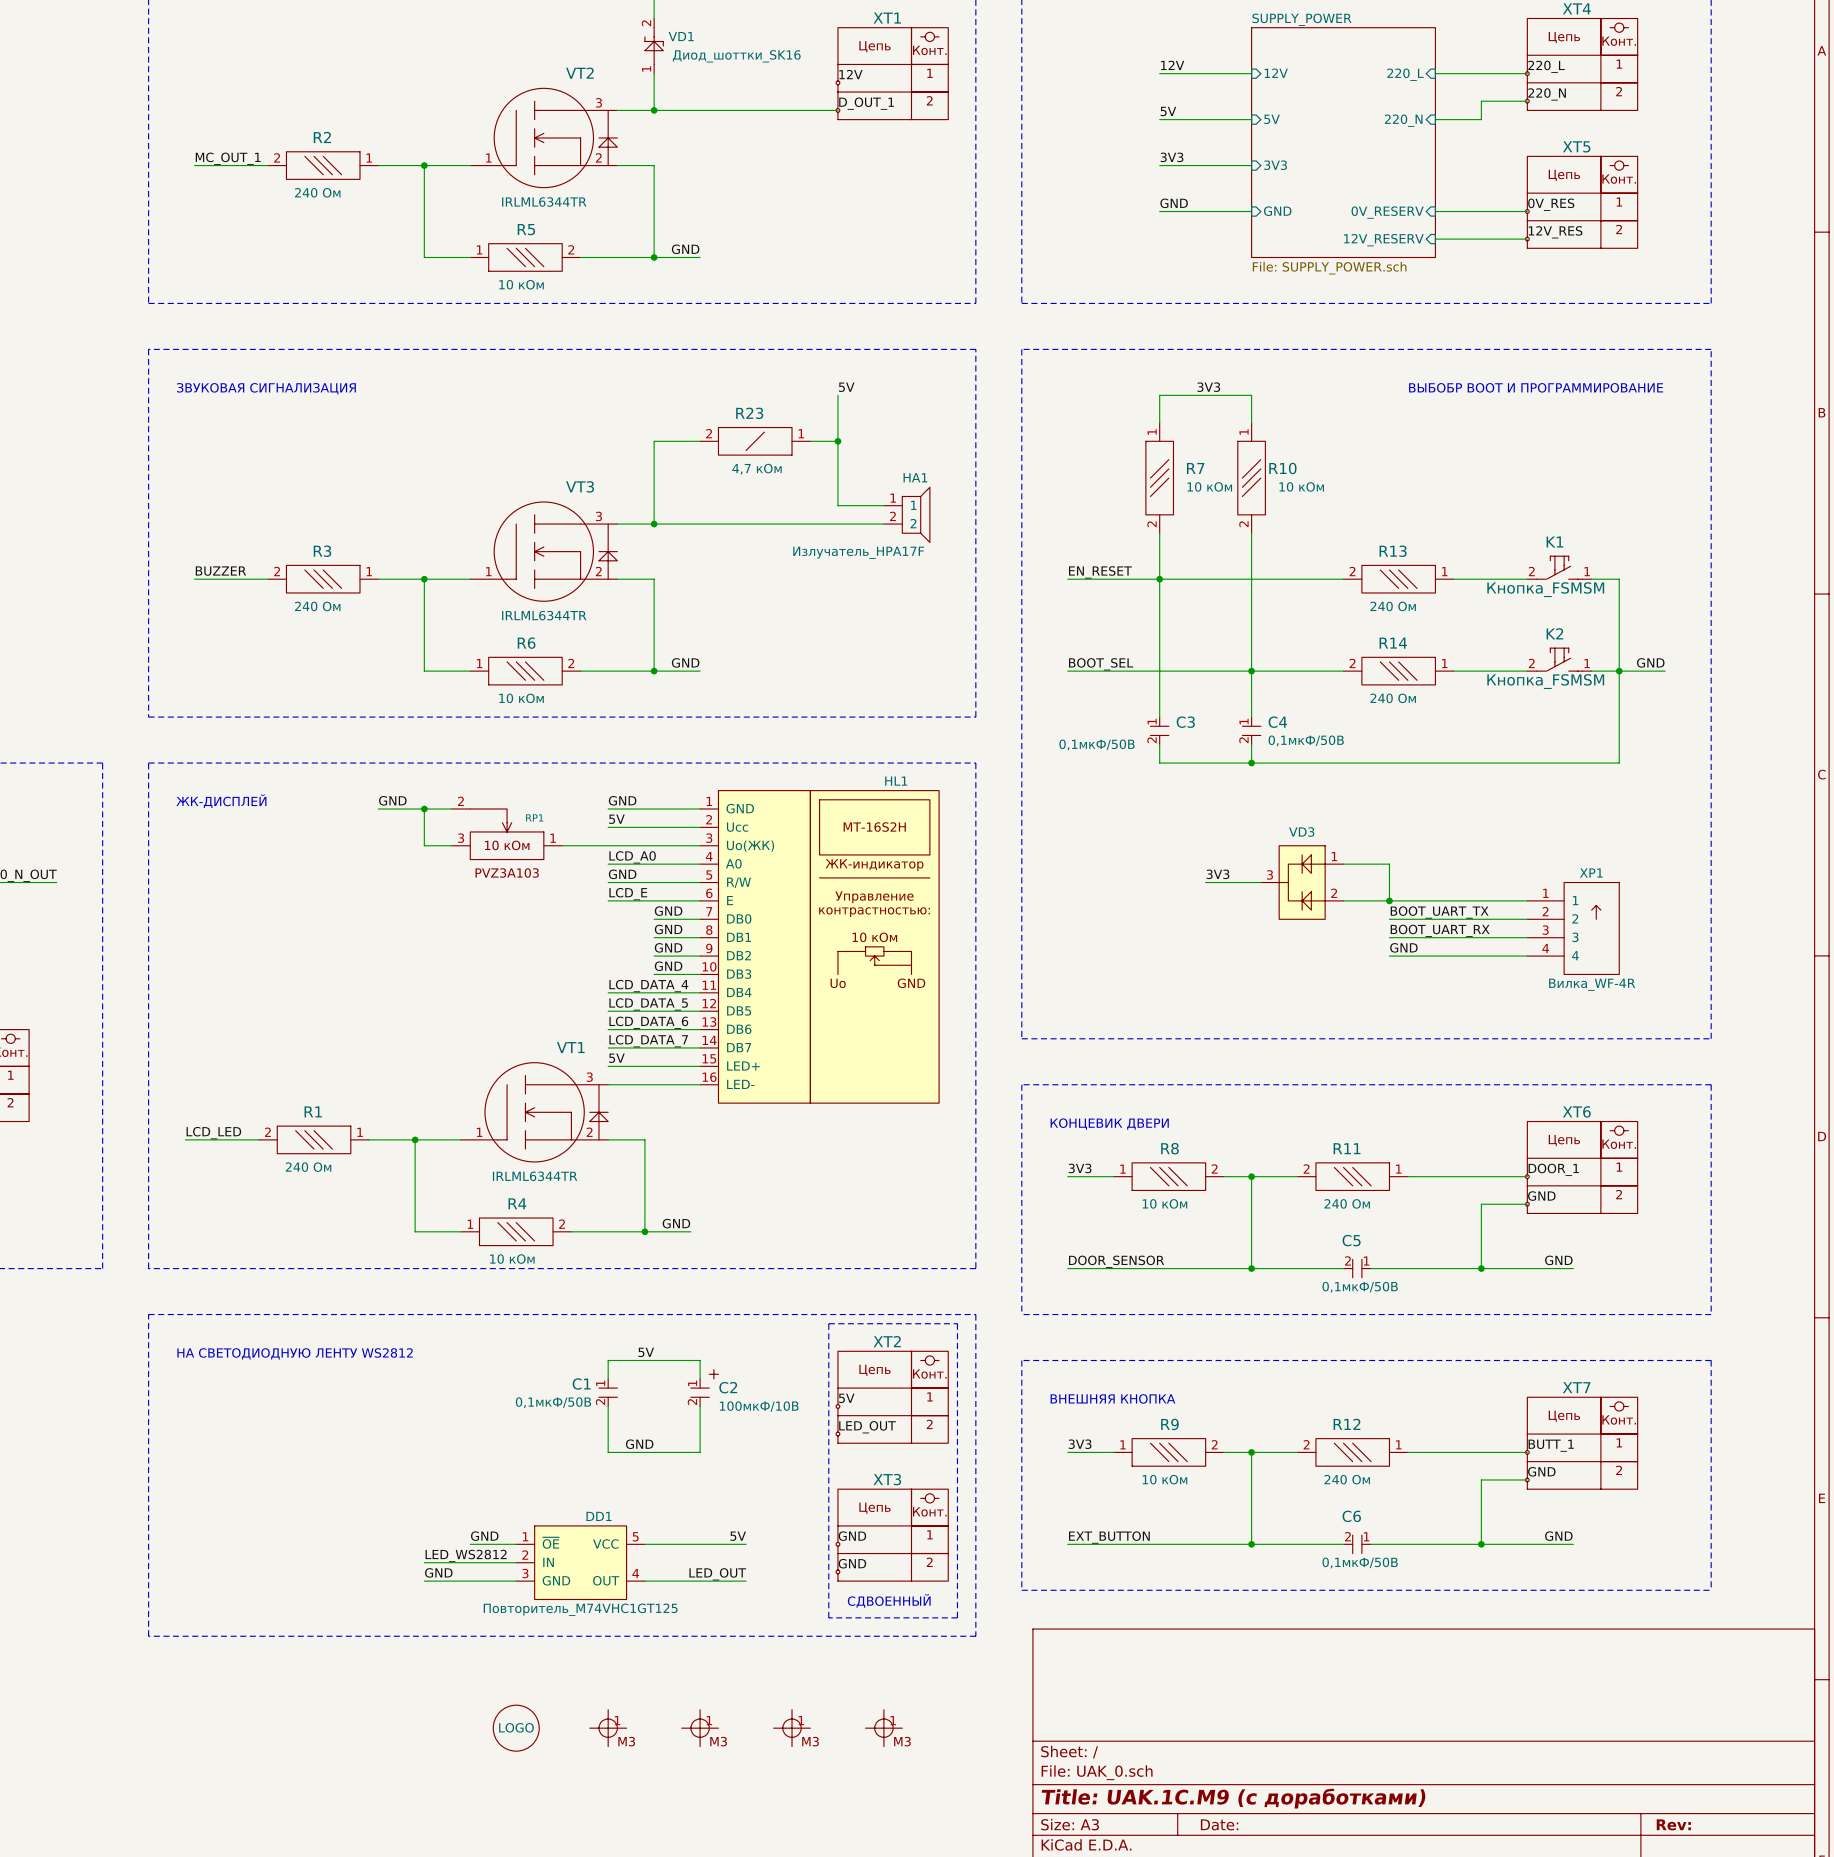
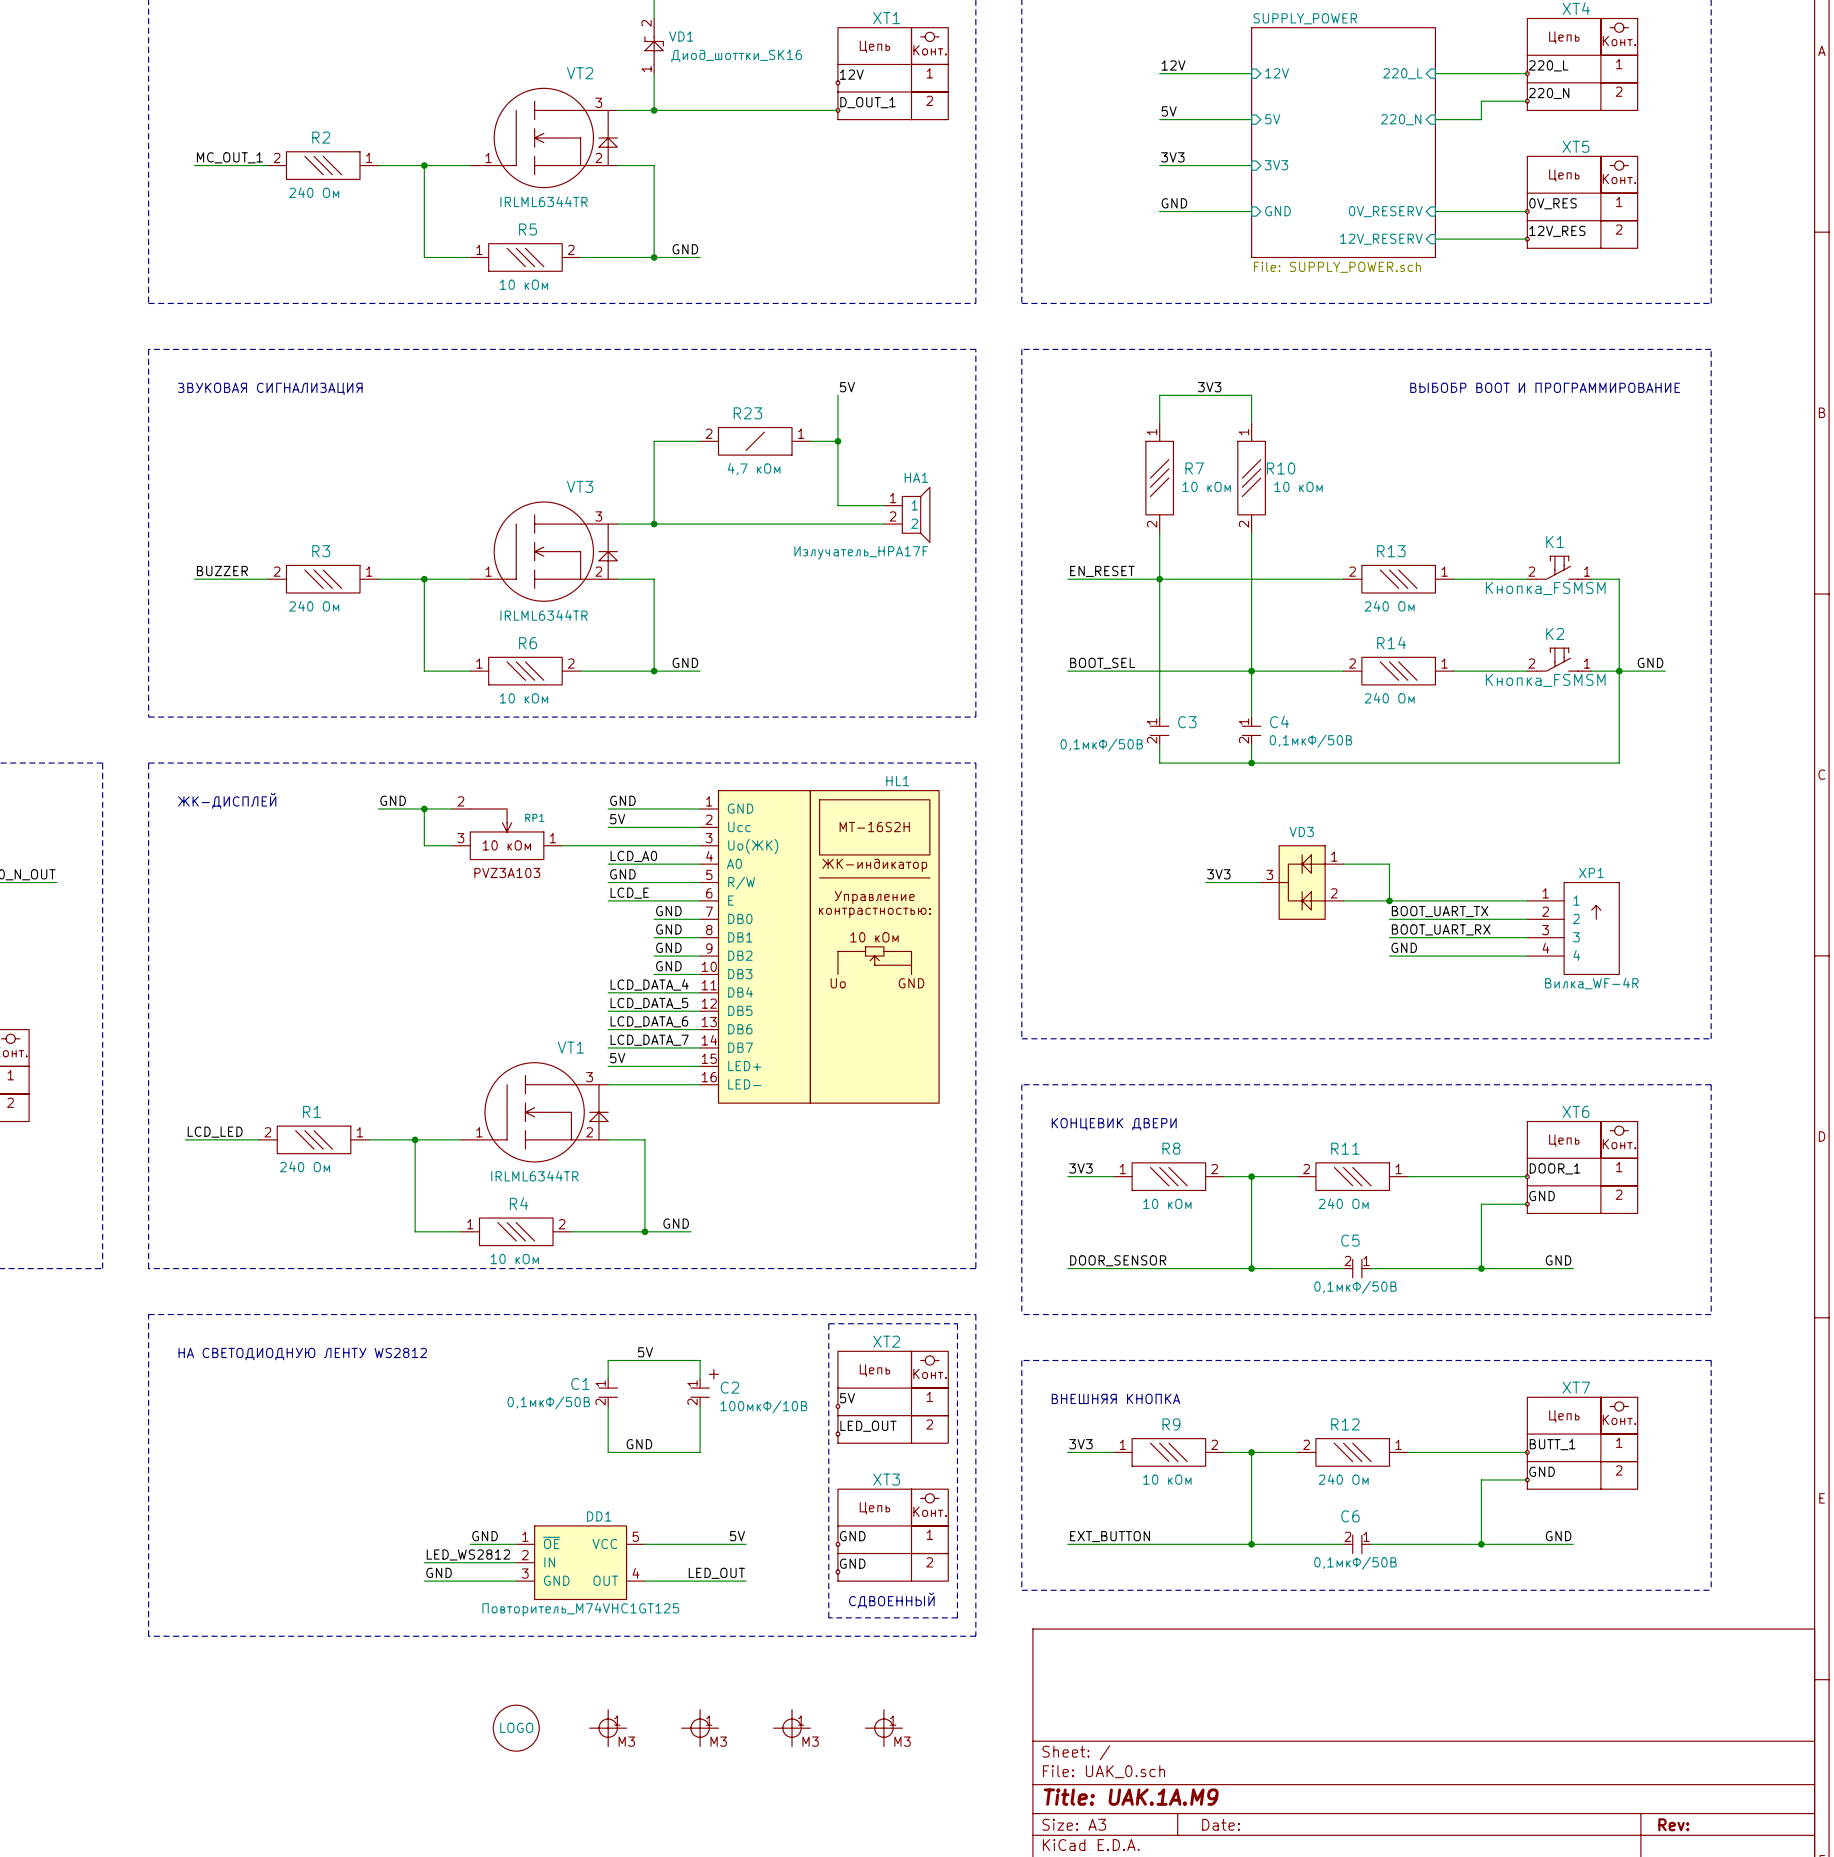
title block: Title: UAK.1C.M9 (с доработками) (1233, 1798) -> Title: UAK.1A.M9 (1131, 1797)

